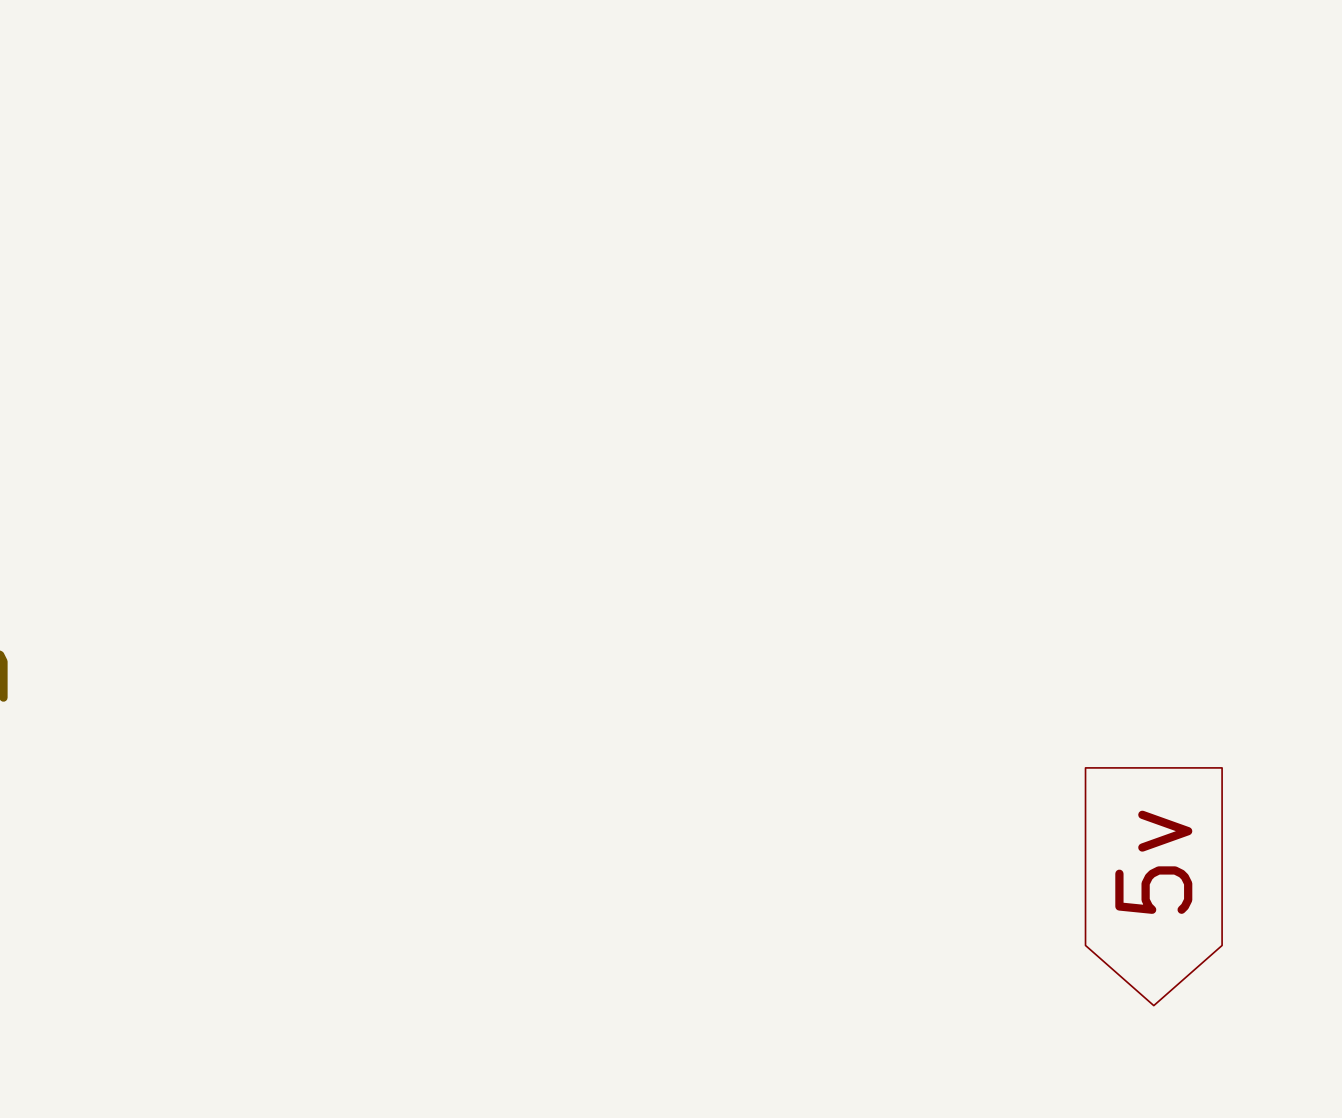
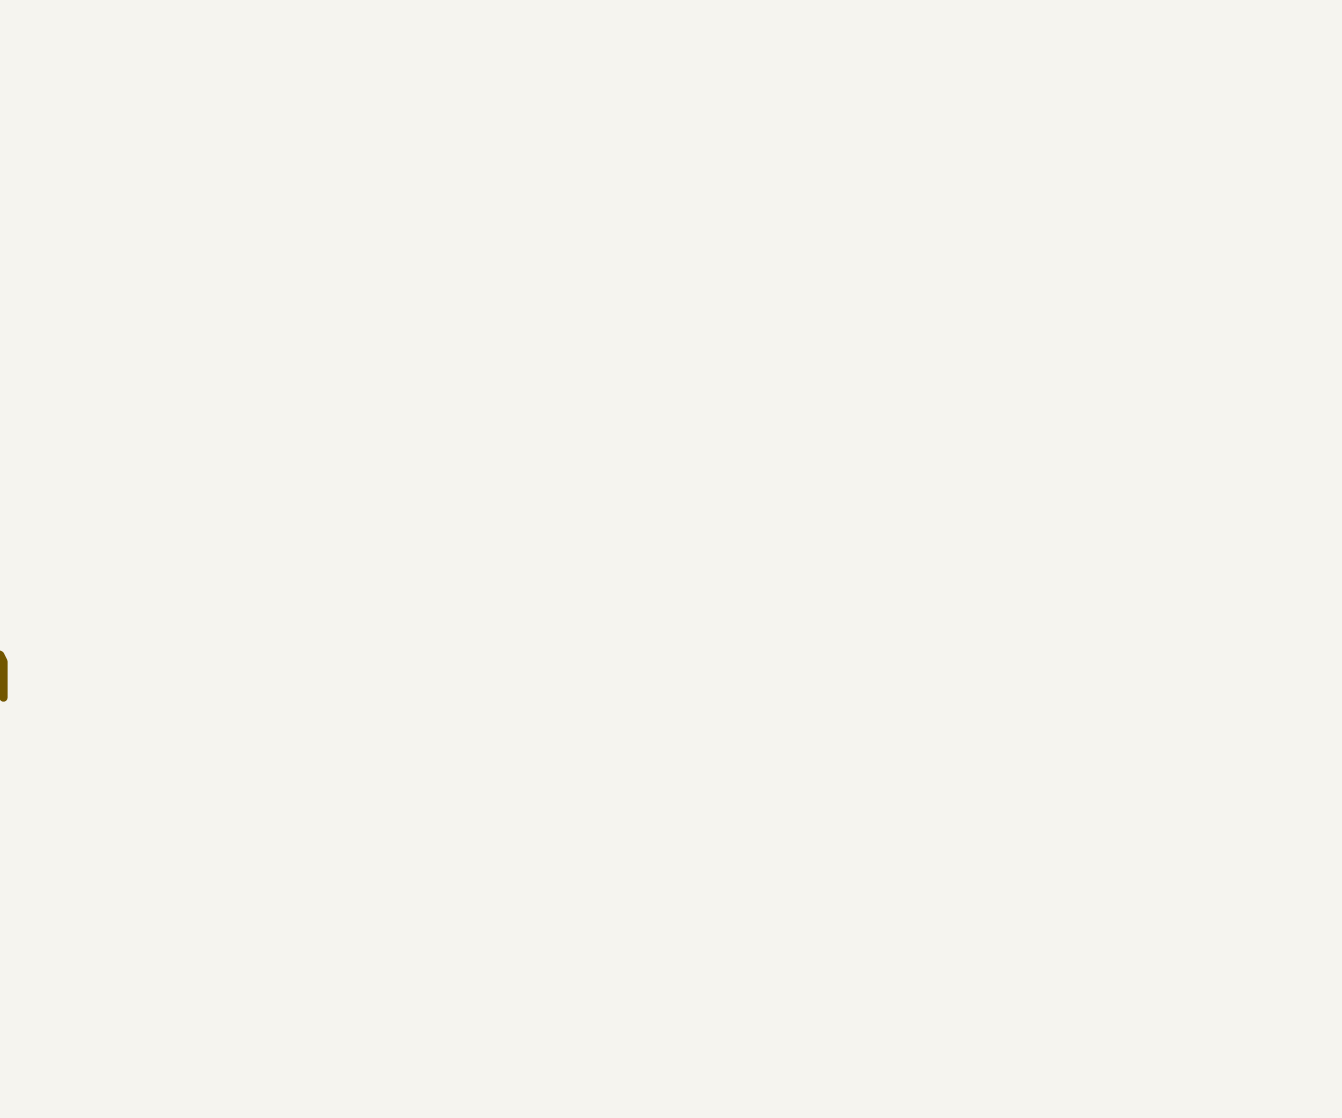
global label: 5v (1153, 862) -> none

